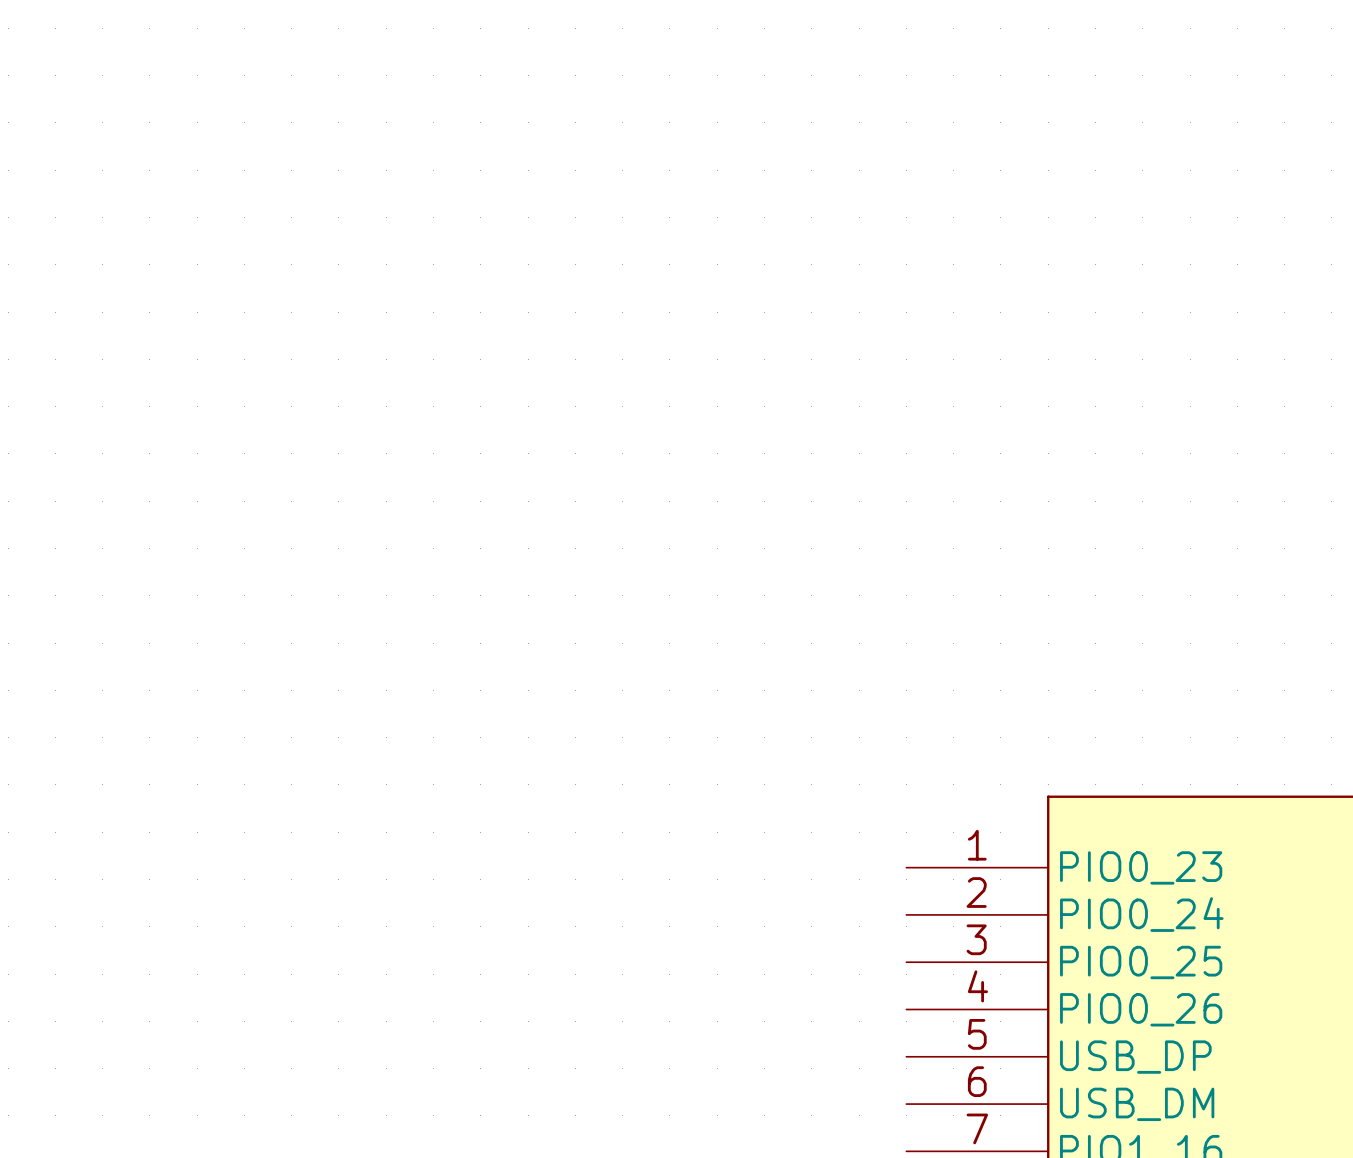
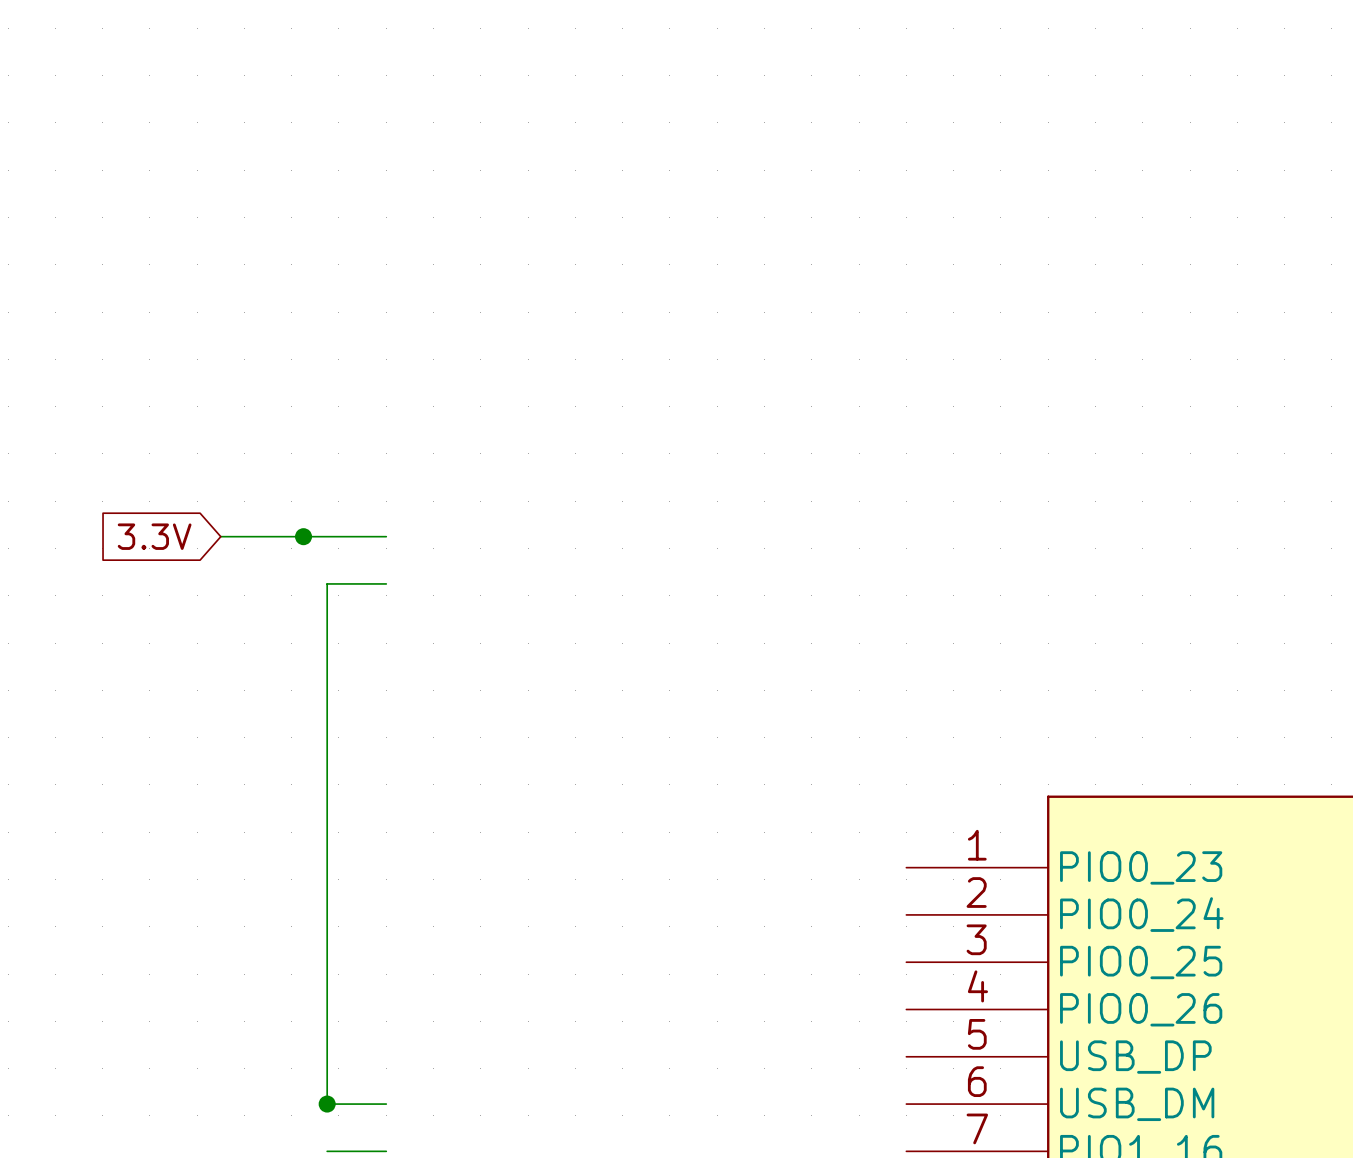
global label: none -> 3.3V (154, 536)
wire: none -> (220, 536) (386, 536)
junction: none -> (303, 536)
wire: none -> (386, 583) (327, 583) (327, 1104) (386, 1104)
junction: none -> (327, 1104)
wire: none -> (327, 1151) (386, 1151)

